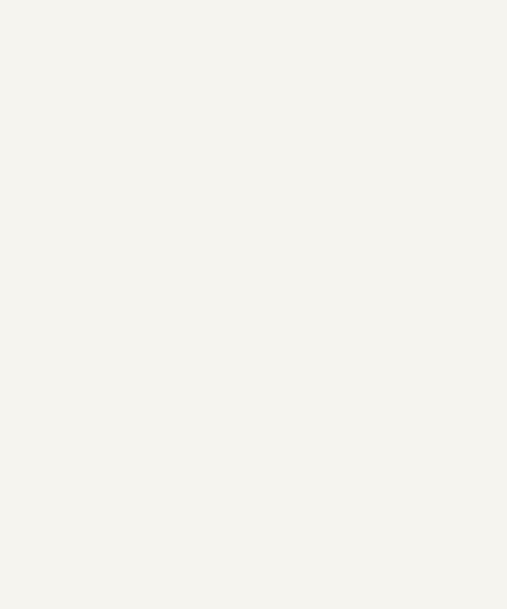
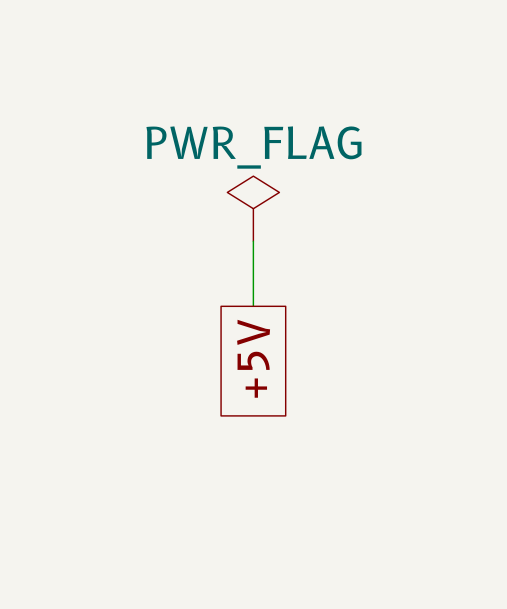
power symbol: none -> PWR_FLAG (253, 208)
wire: none -> (253, 241) (253, 306)
global label: none -> +5V (253, 358)

